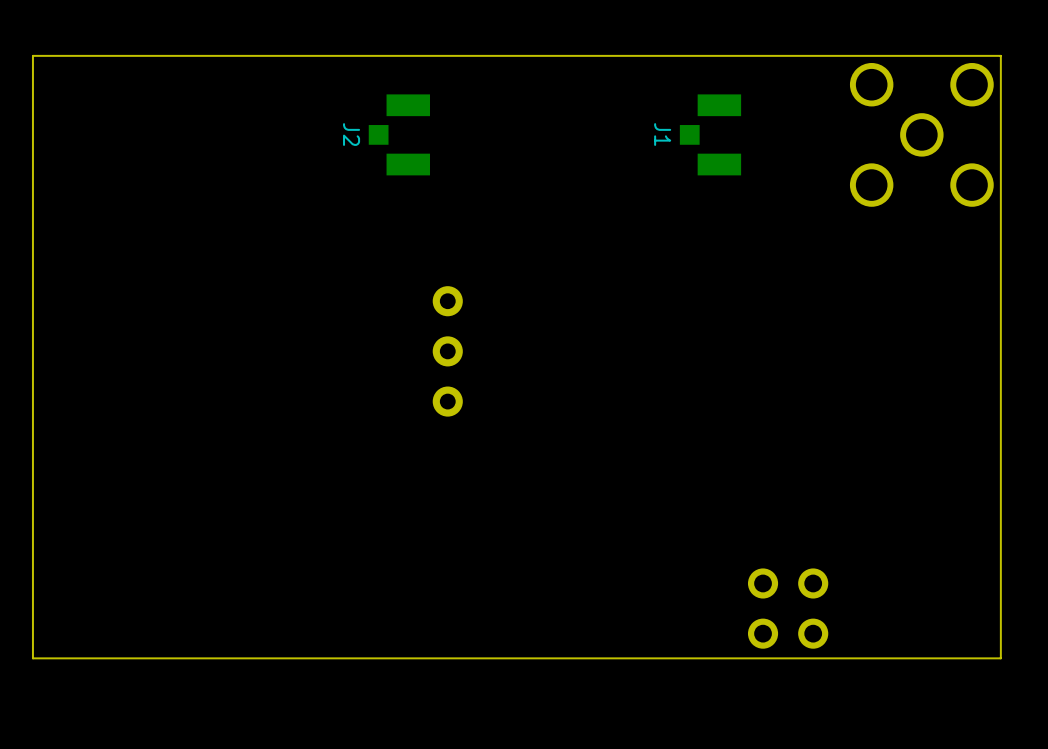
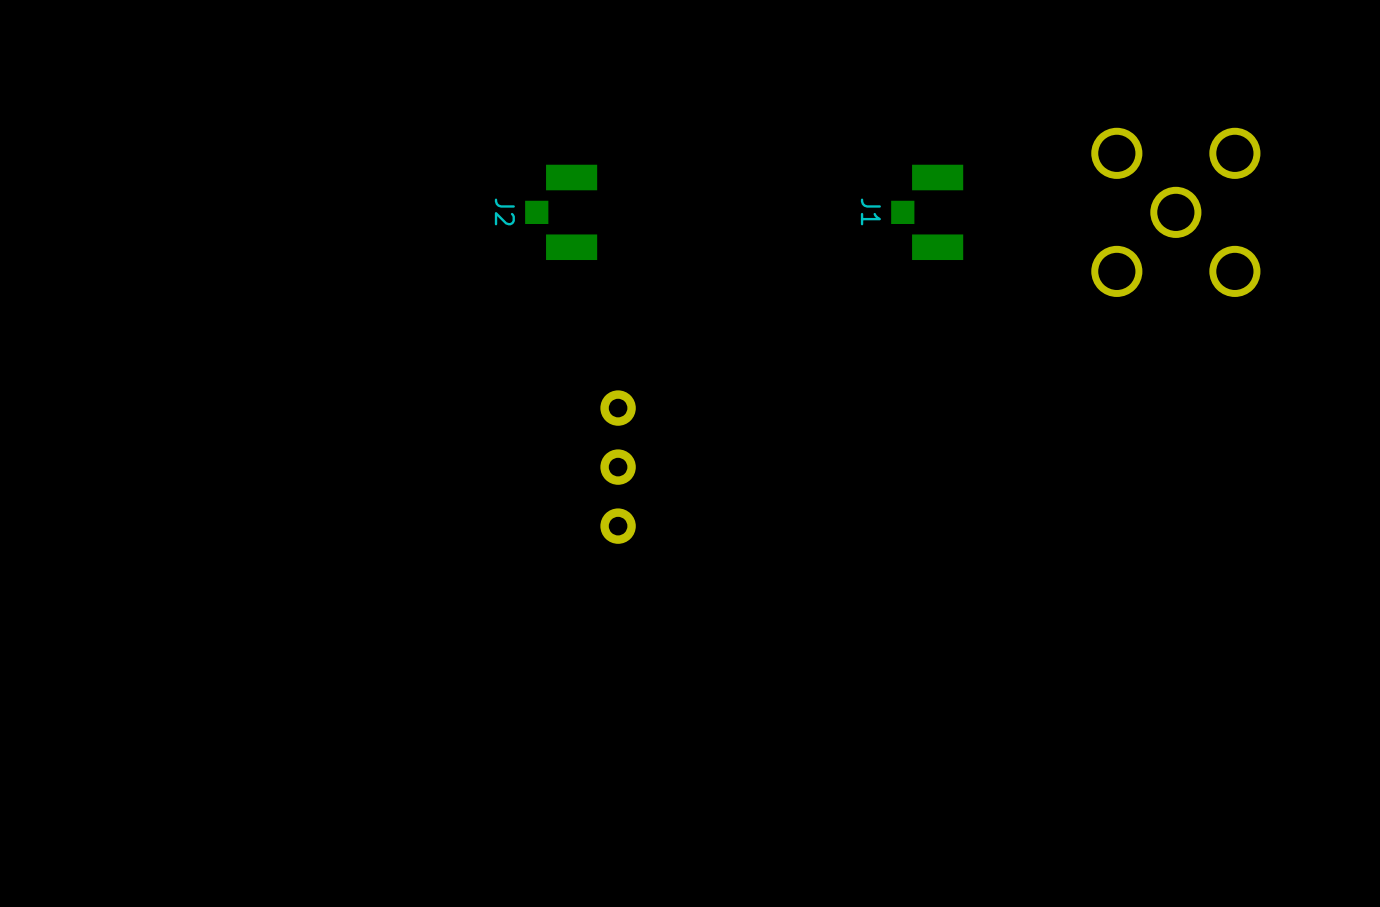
board edge: (1000, 55) (1000, 658) (32, 658) (32, 55) (1000, 55) -> none
part: (763, 583) -> none
part: (813, 583) -> none
part: (763, 633) -> none
part: (813, 633) -> none

